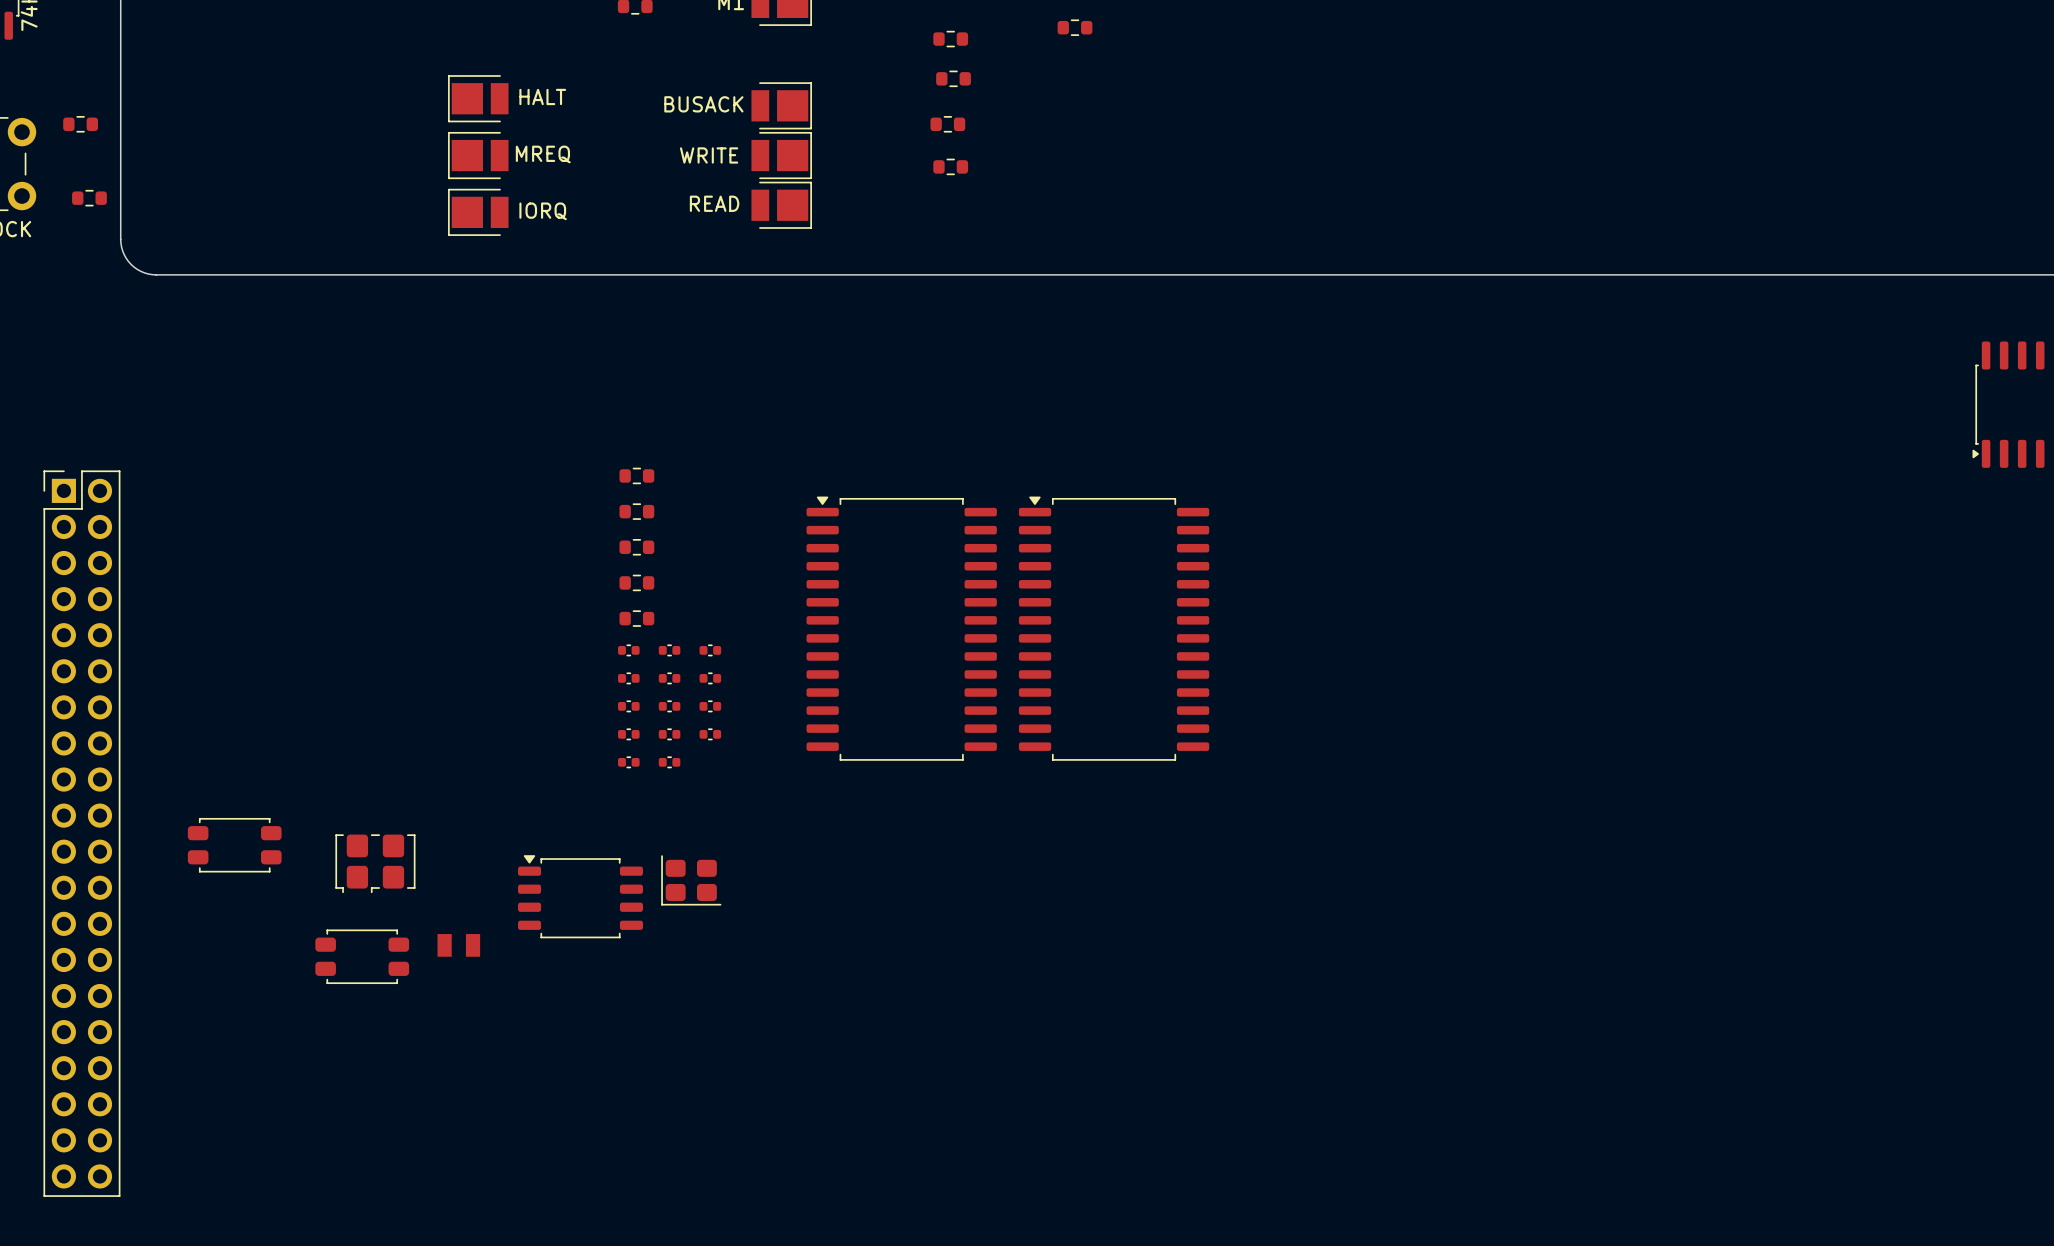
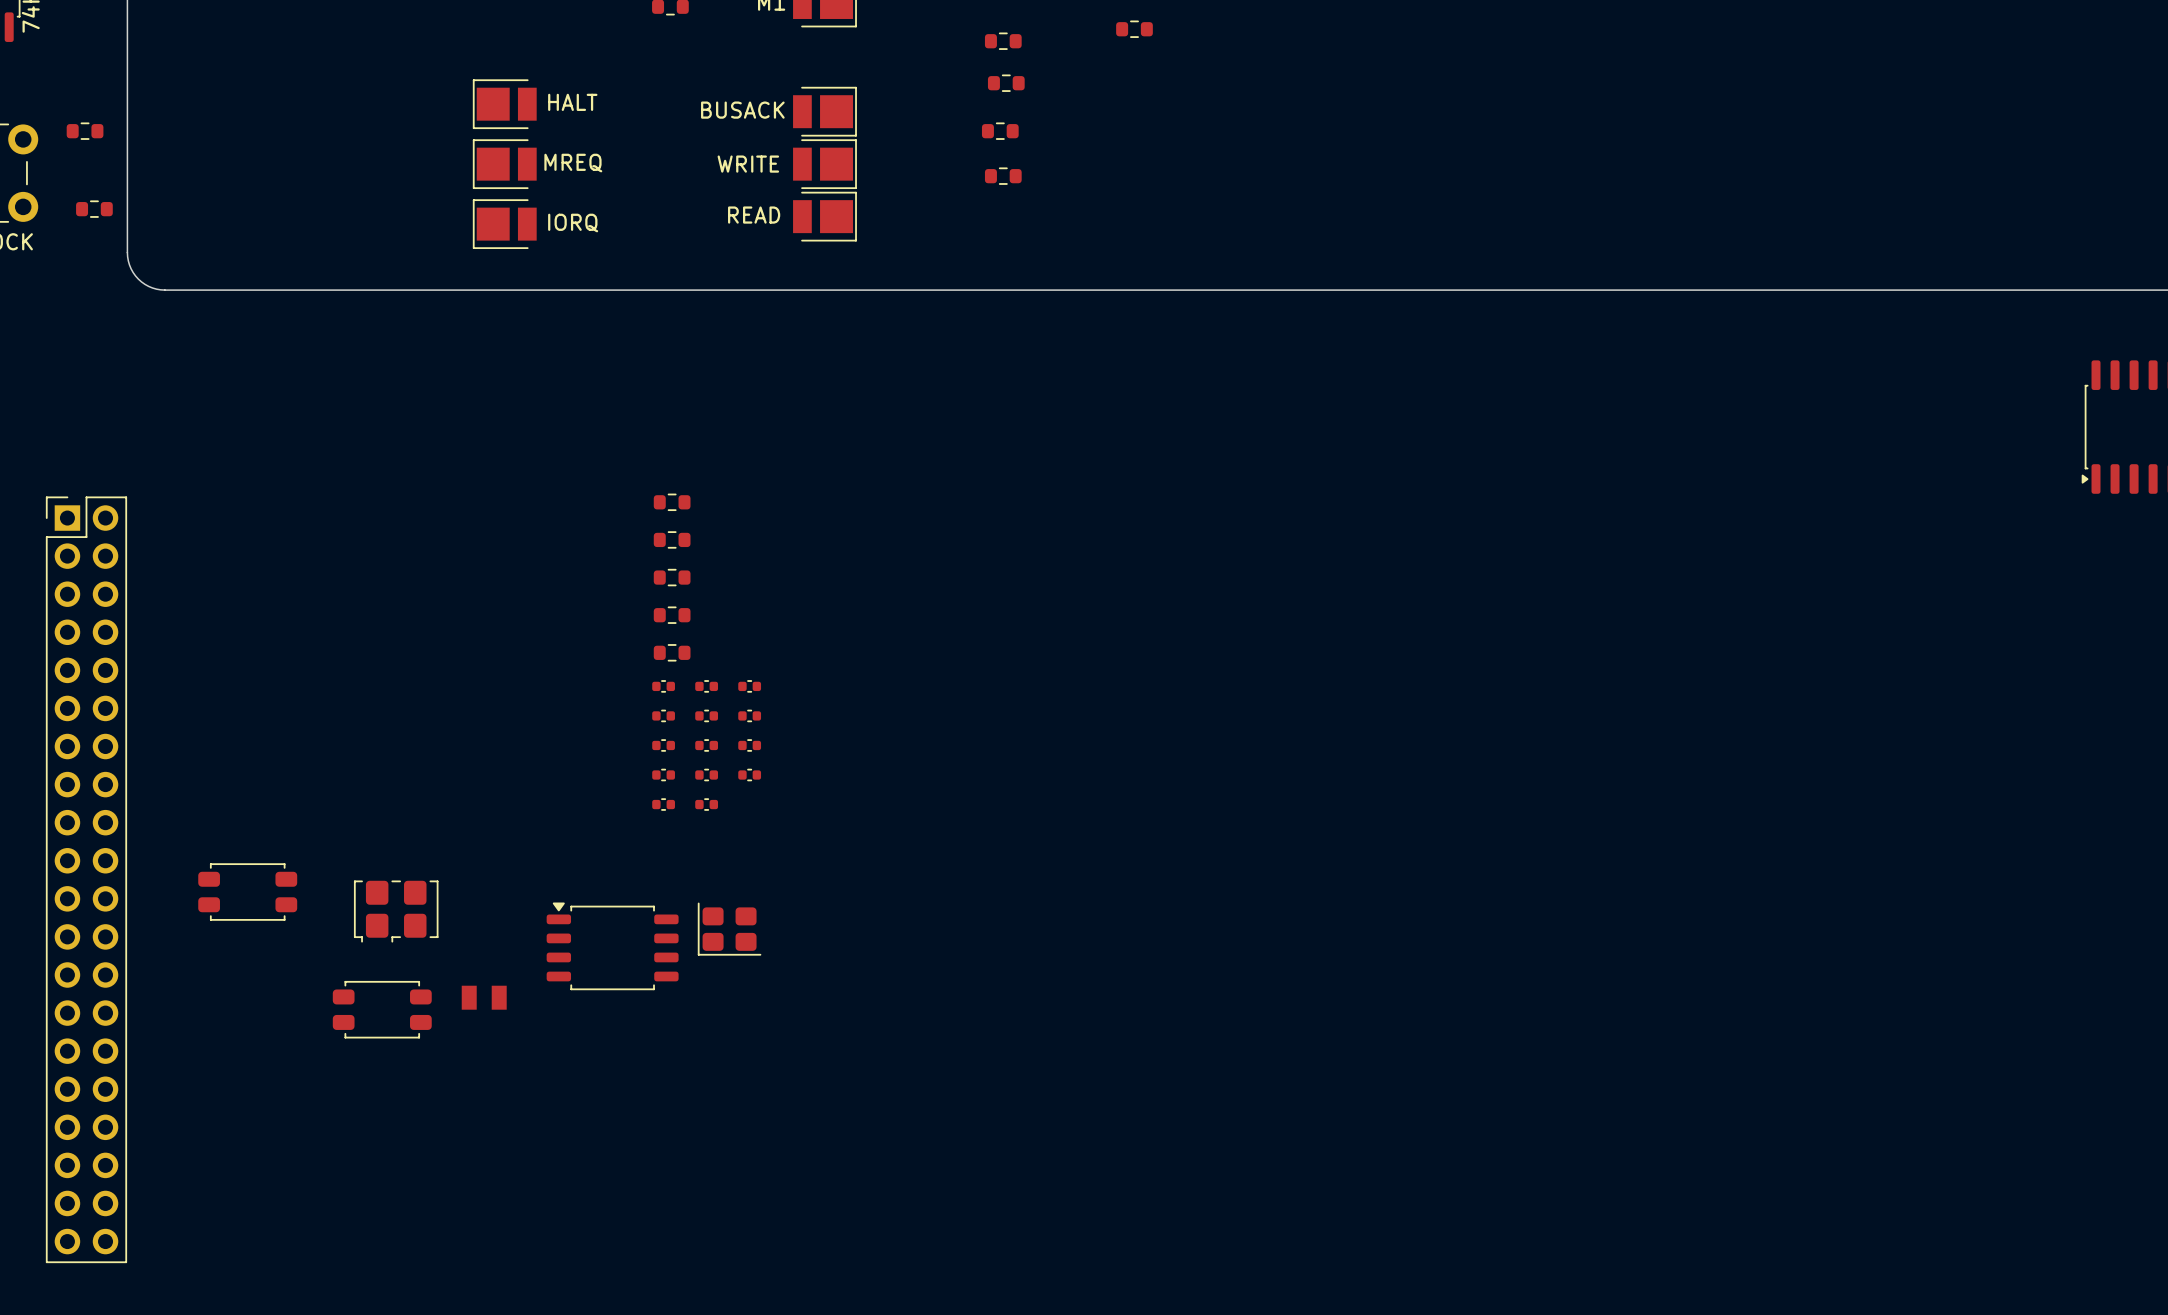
part: (901, 628) -> none
part: (1114, 628) -> none

